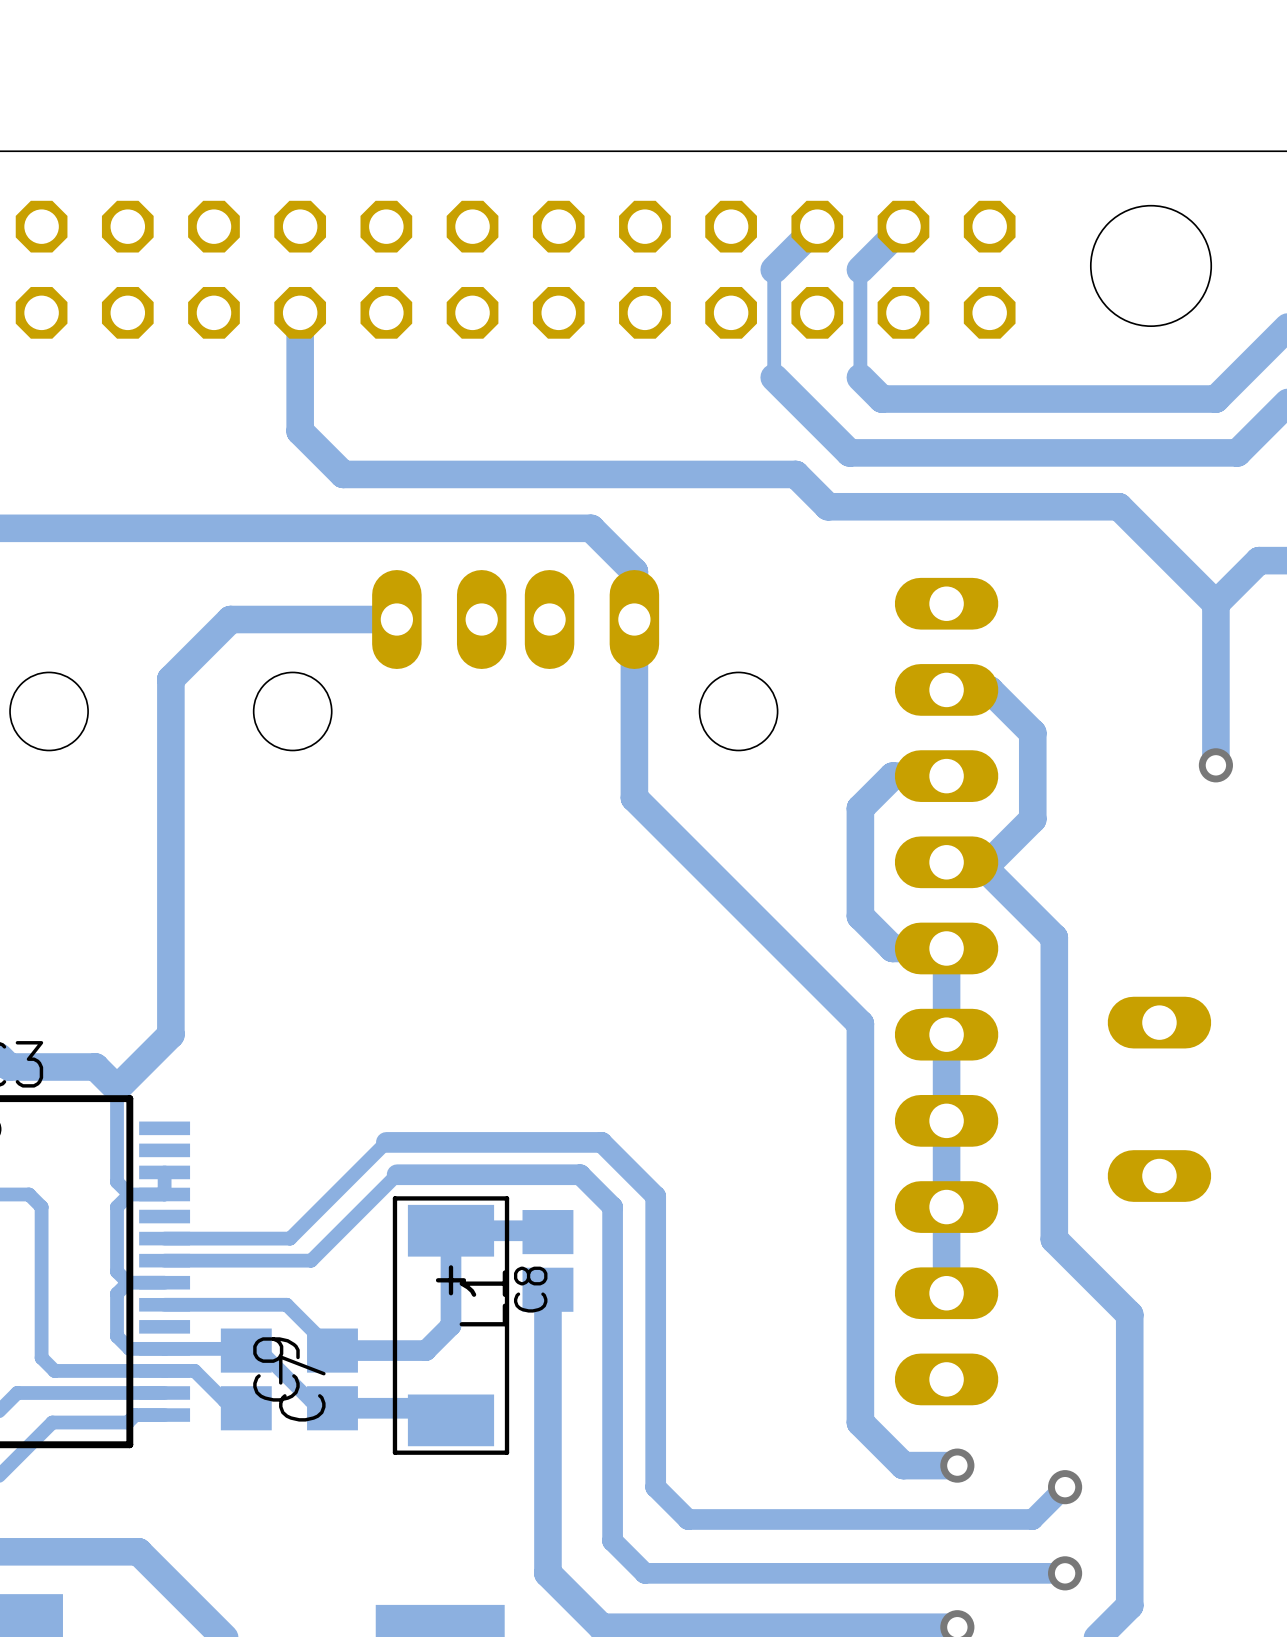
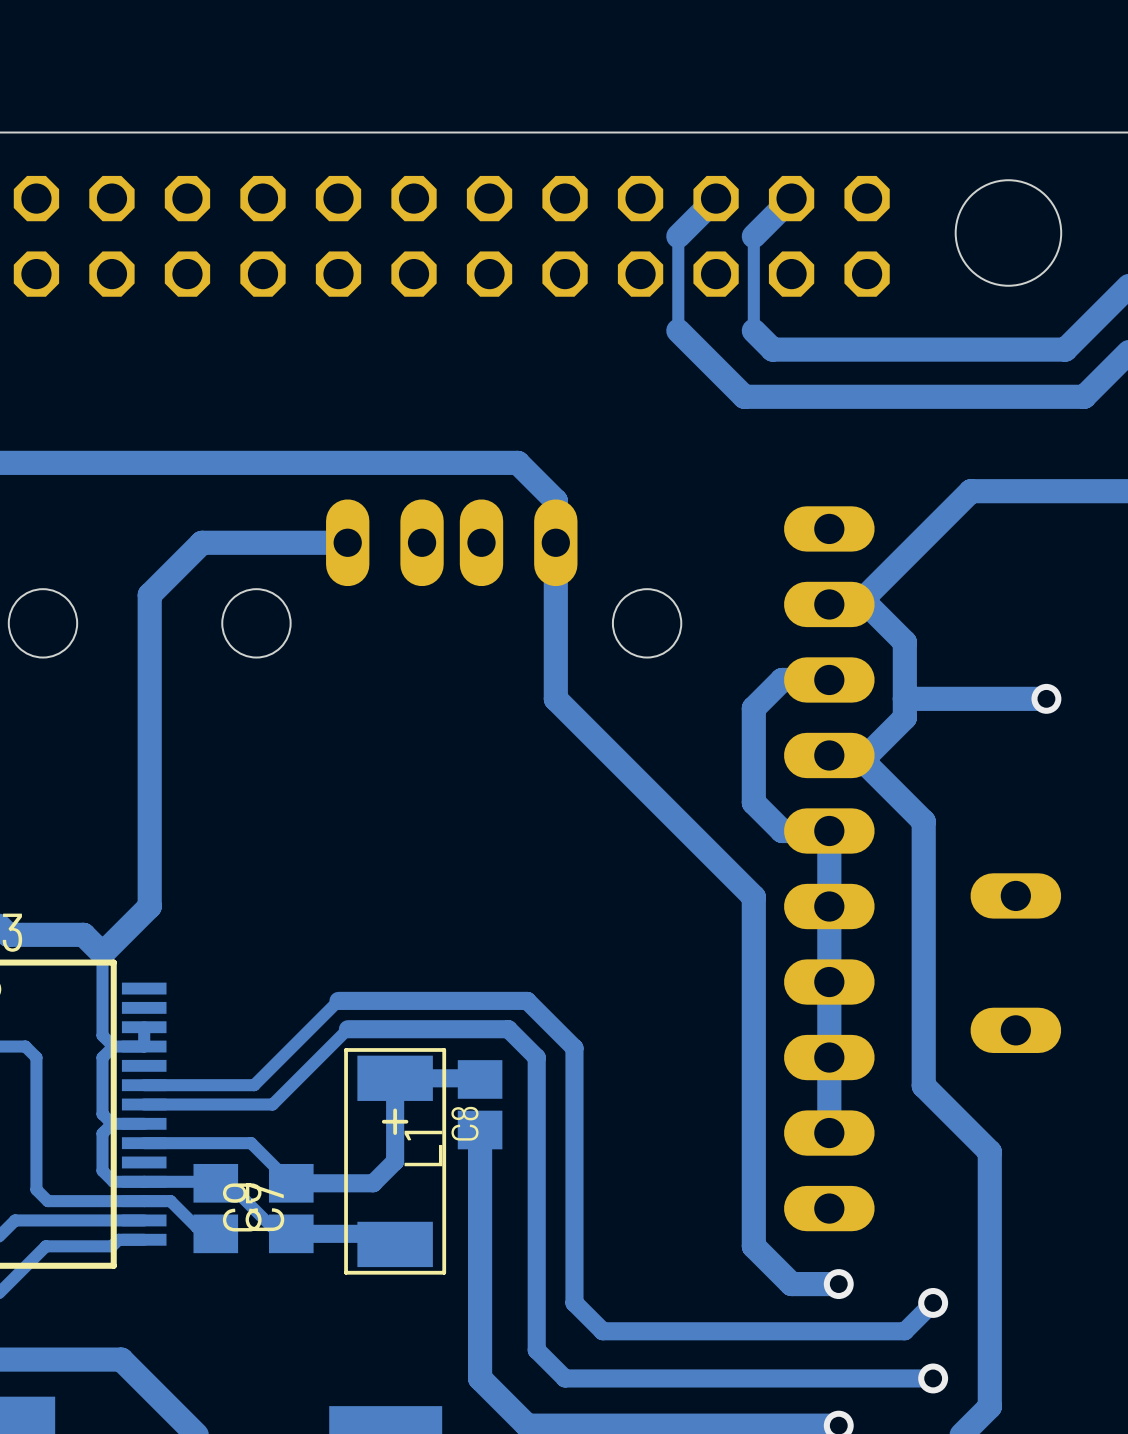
track: (300, 312) (300, 431) (343, 474) (795, 474) (828, 506) (1118, 506) (1215, 603) -> none
track: (1259, 560) (1215, 603) -> (1103, 491) (970, 491) (857, 604)
track: (1215, 603) (1215, 765) -> none
via position: (1215, 765) -> (1046, 698)
track: none -> (1046, 698) (904, 698)

